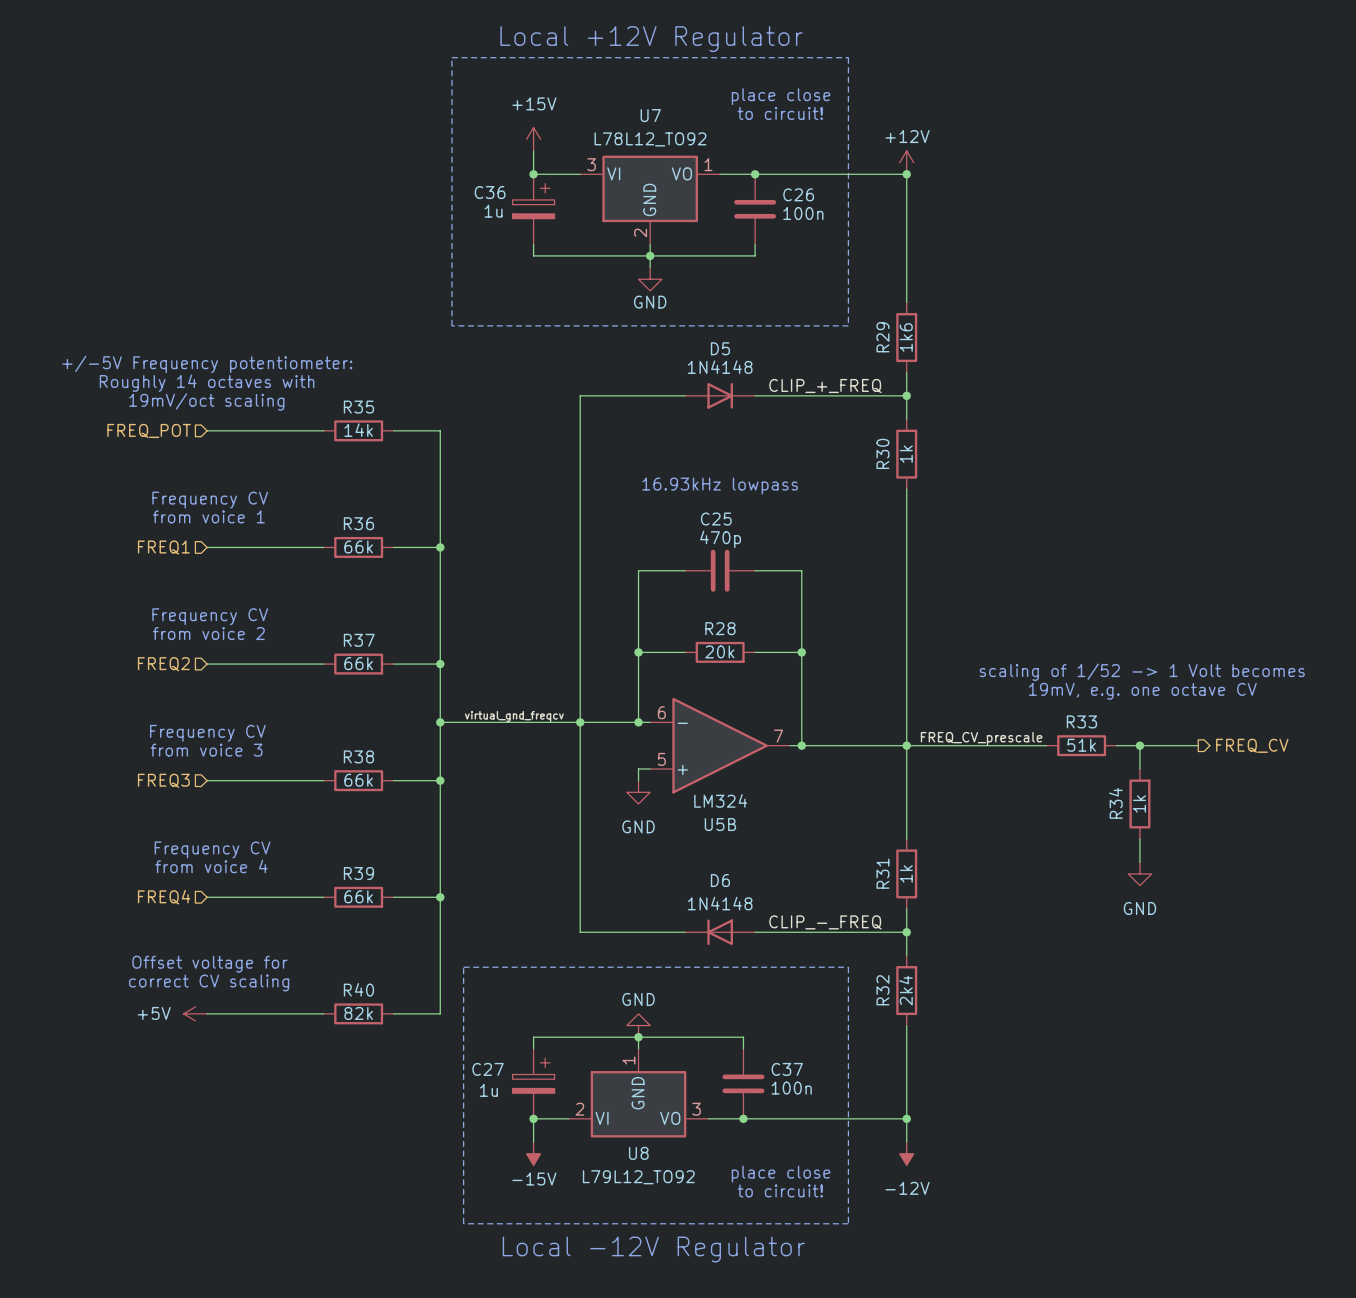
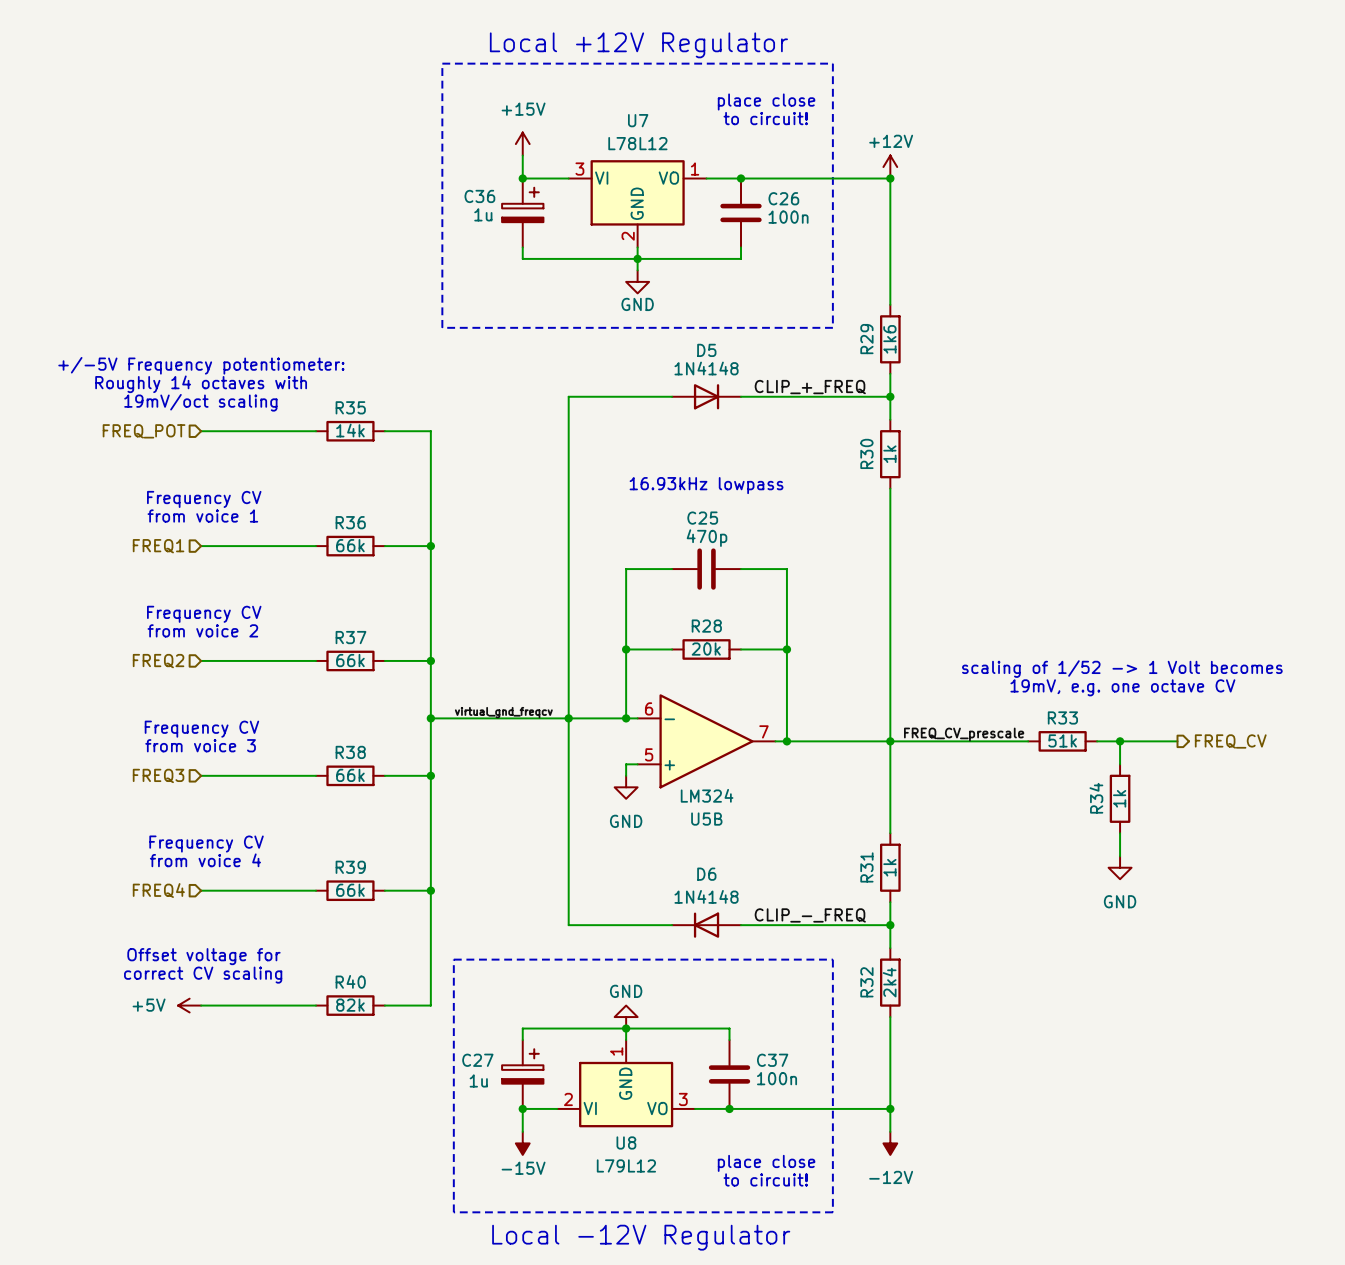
U7 value: L78L12_TO92 (650, 139) -> L78L12 (637, 143)
U8 value: L79L12_TO92 (638, 1177) -> L79L12 (626, 1165)

